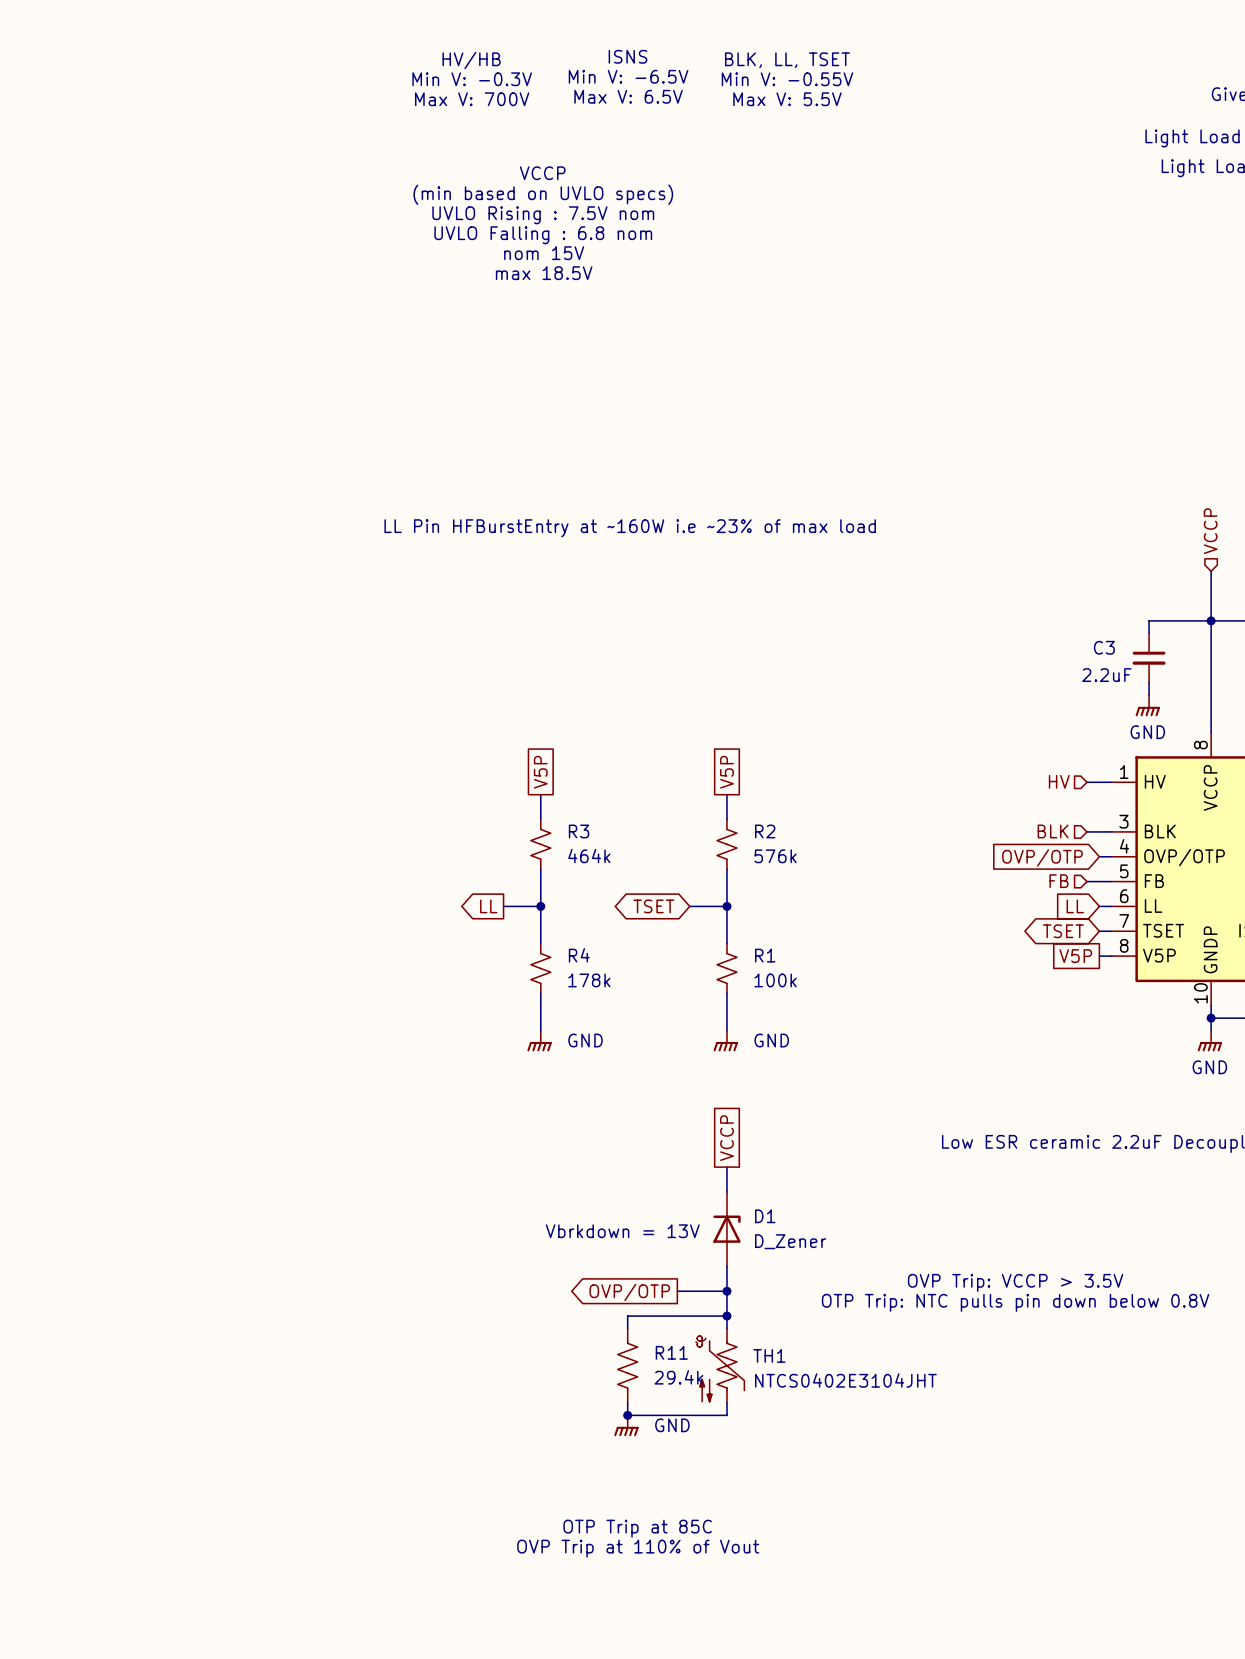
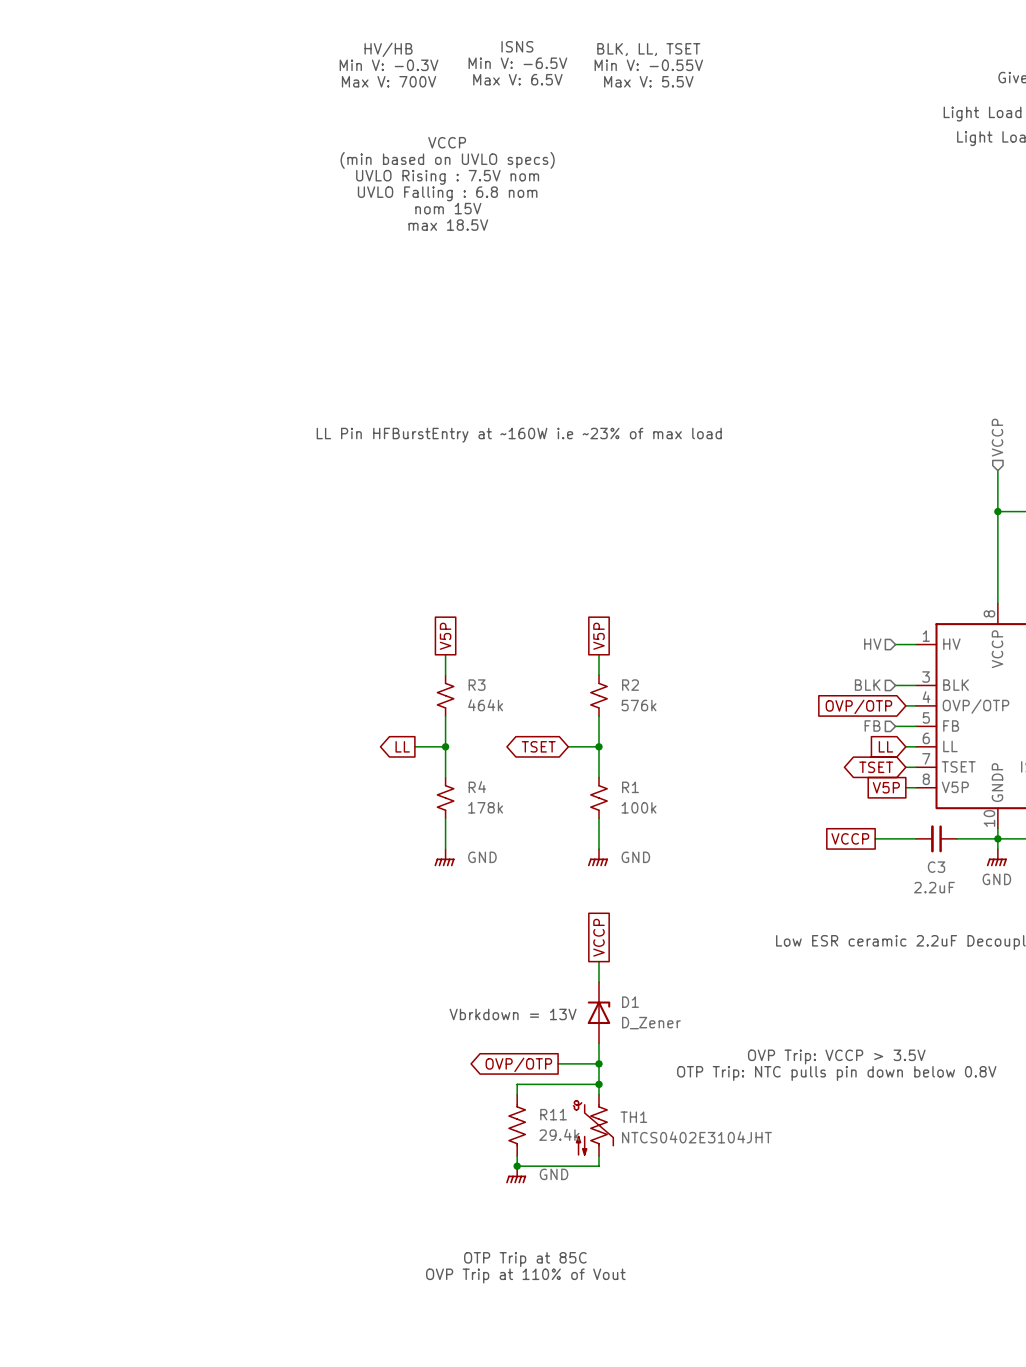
wire: (1211, 620) (1149, 620) (1149, 633) -> none
C3 name position: C3 (1104, 647) -> C3 (936, 867)
C3 rotation: 0° (1149, 658) -> 90° clockwise (936, 838)
C3 position: (1149, 658) -> (936, 838)
C3 value position: 2.2uF (1106, 675) -> 2.2uF (934, 887)
wire: (1149, 682) (1149, 695) -> none
power symbol: GND (1147, 705) -> none
global label: none -> VCCP (850, 838)
wire: none -> (875, 838) (916, 838)
wire: none -> (956, 838) (997, 838)

